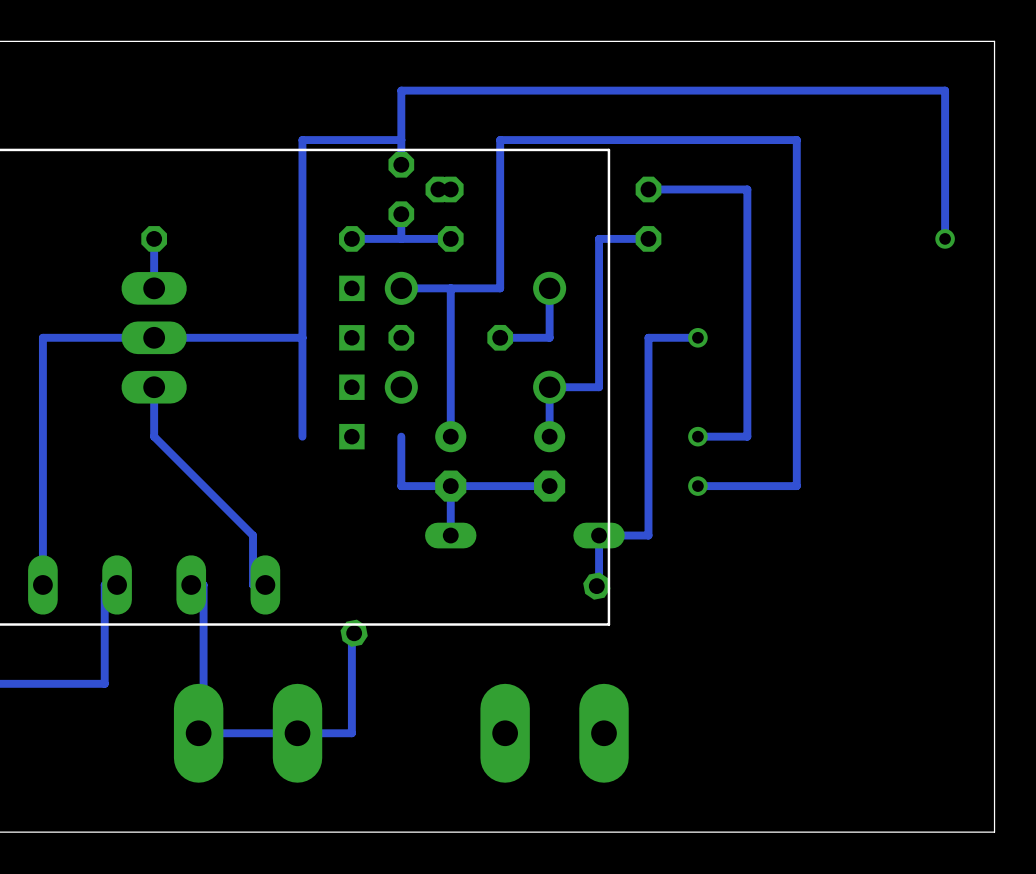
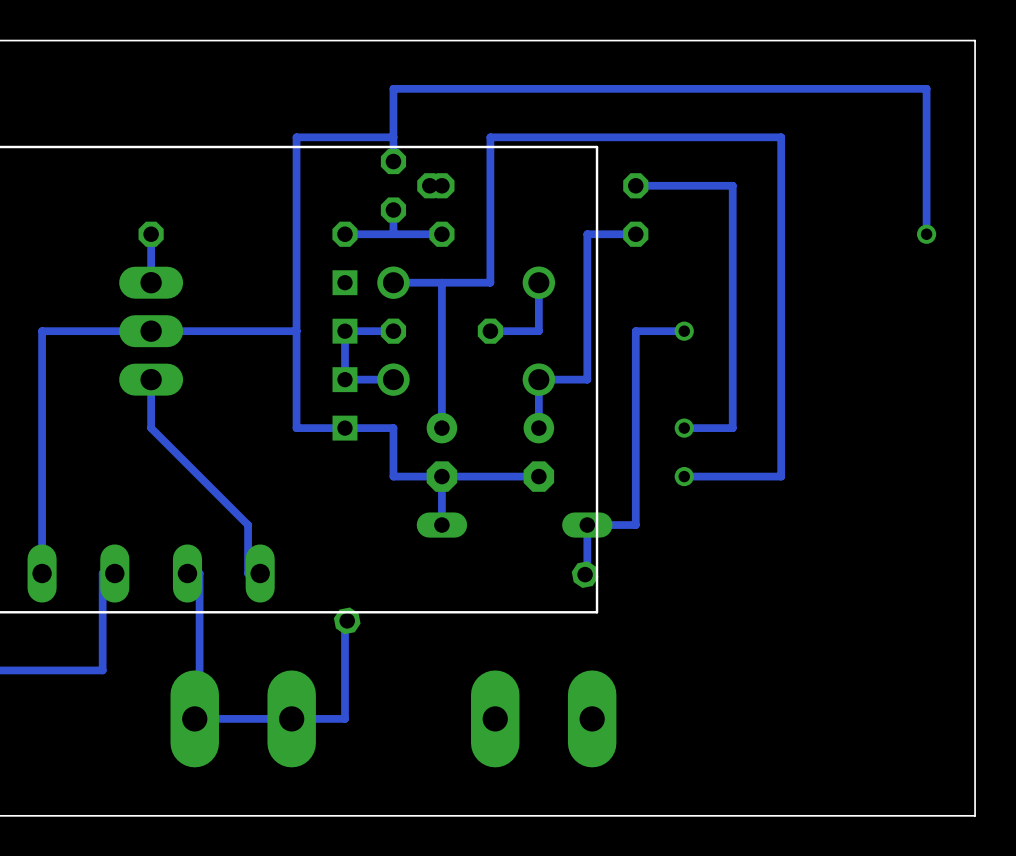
track: none -> (393, 331) (344, 331) (344, 379) (393, 379)
track: none -> (393, 428) (296, 428)

